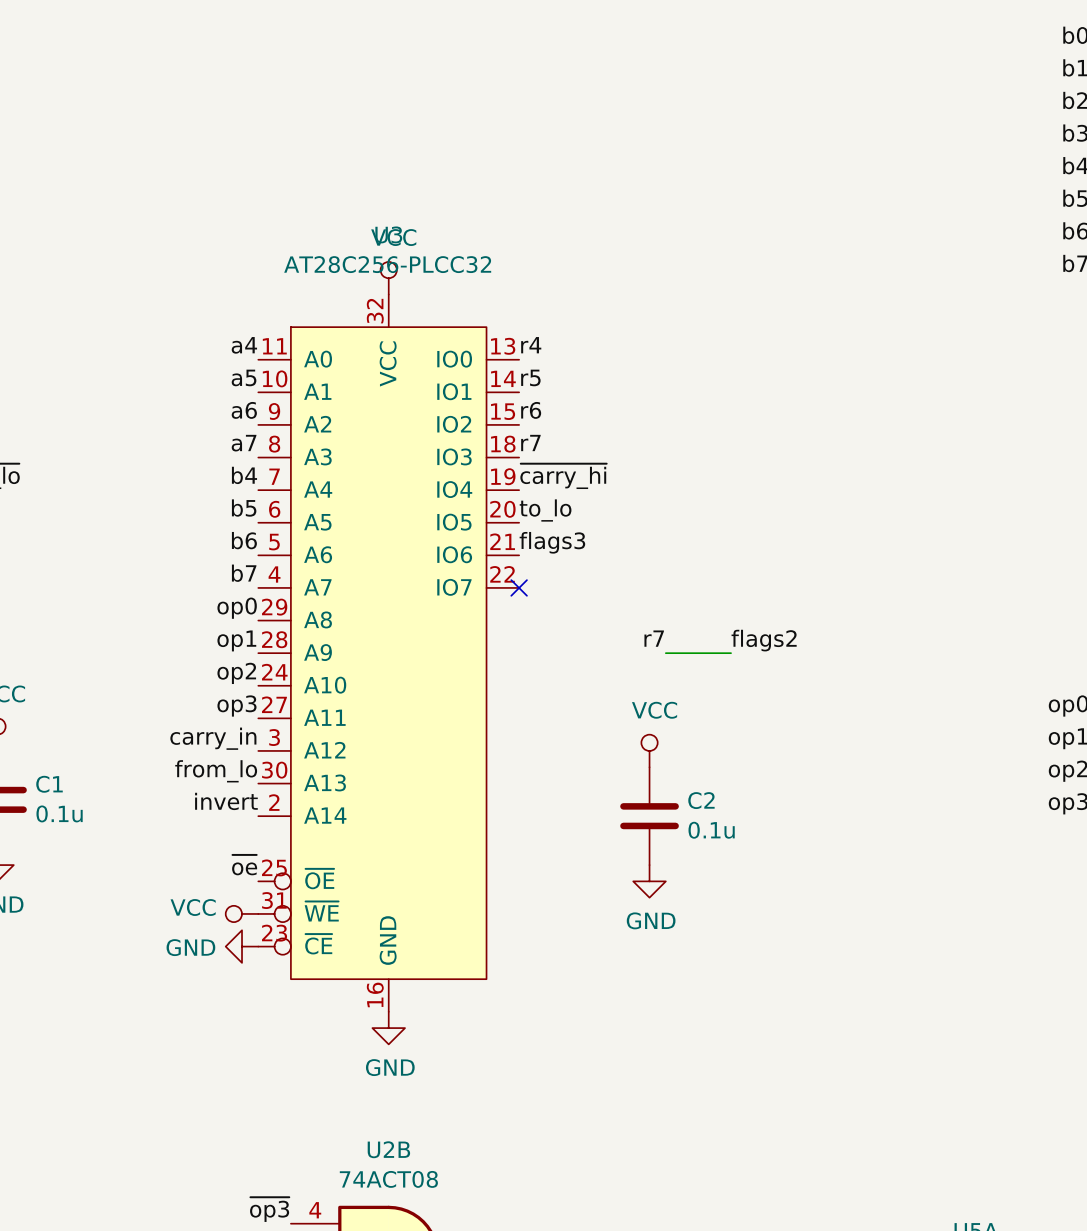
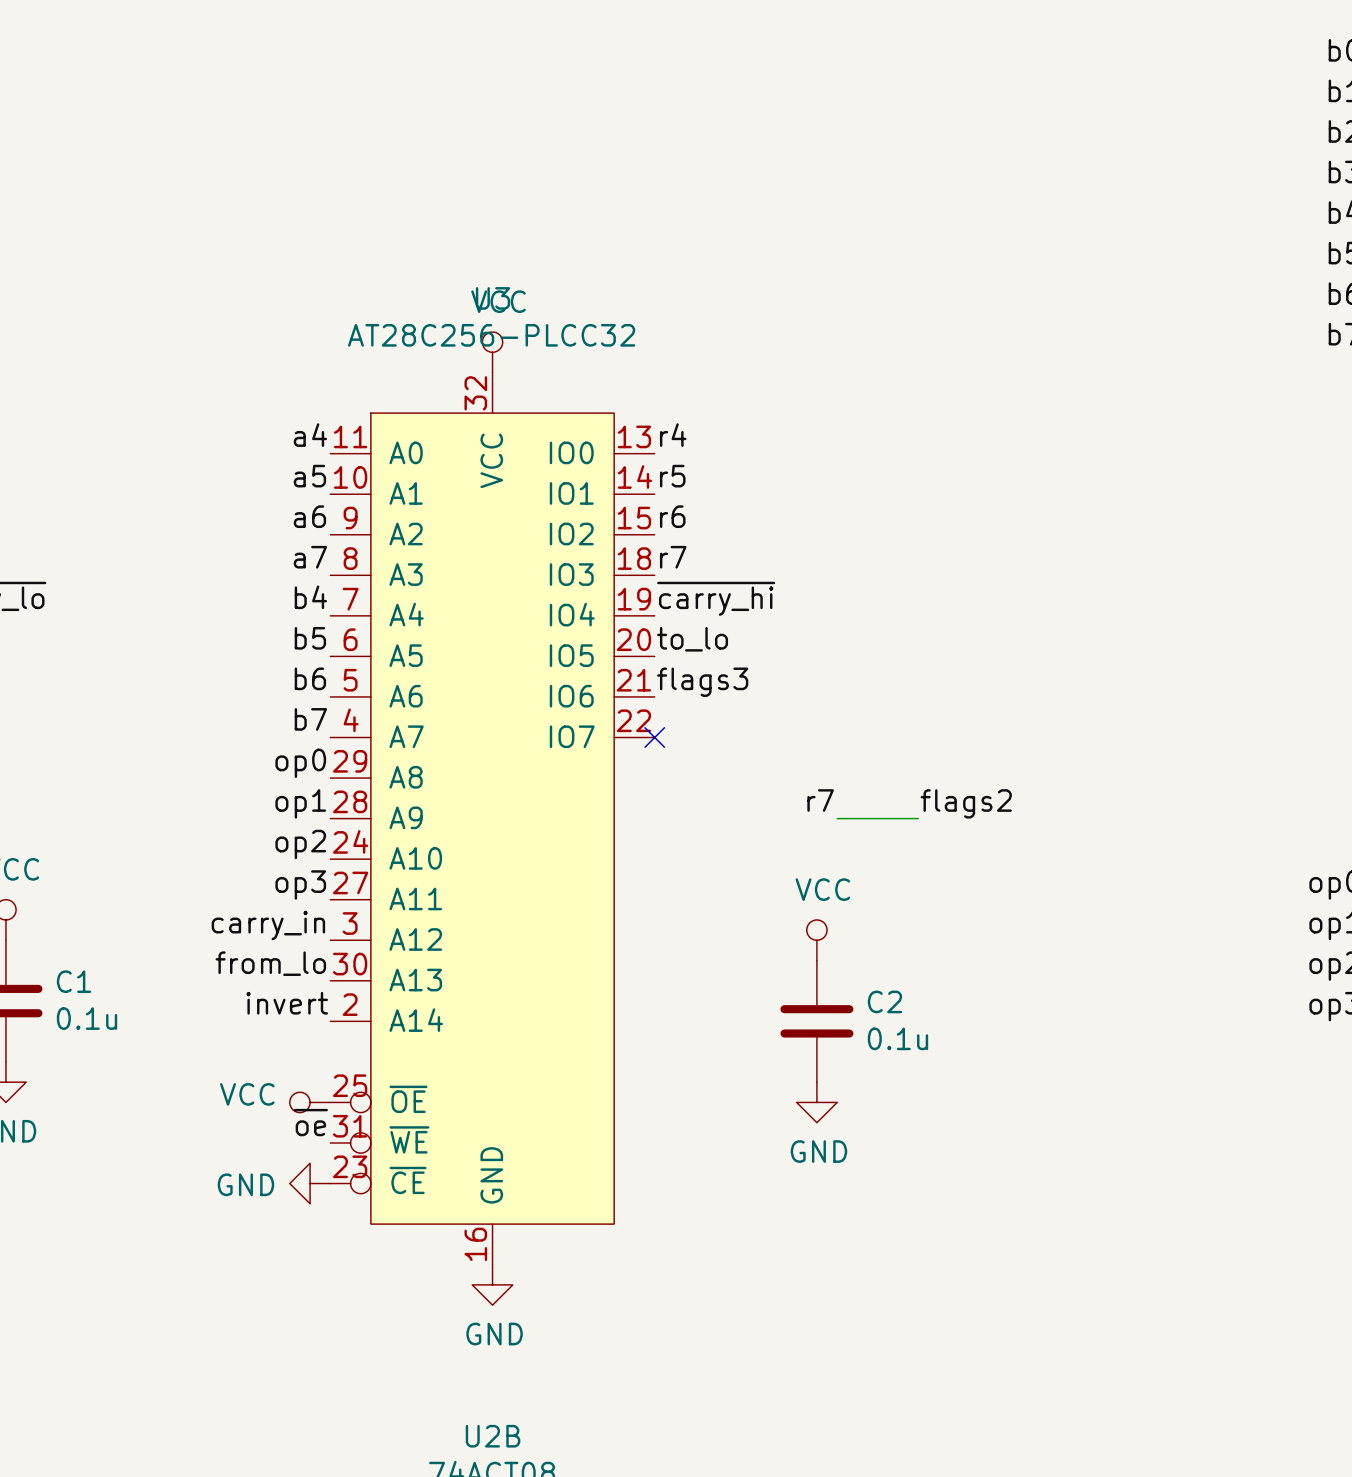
label position: ~{oe} (244, 865) -> ~{oe} (310, 1122)
power symbol position: VCC (242, 913) -> VCC (310, 1102)

